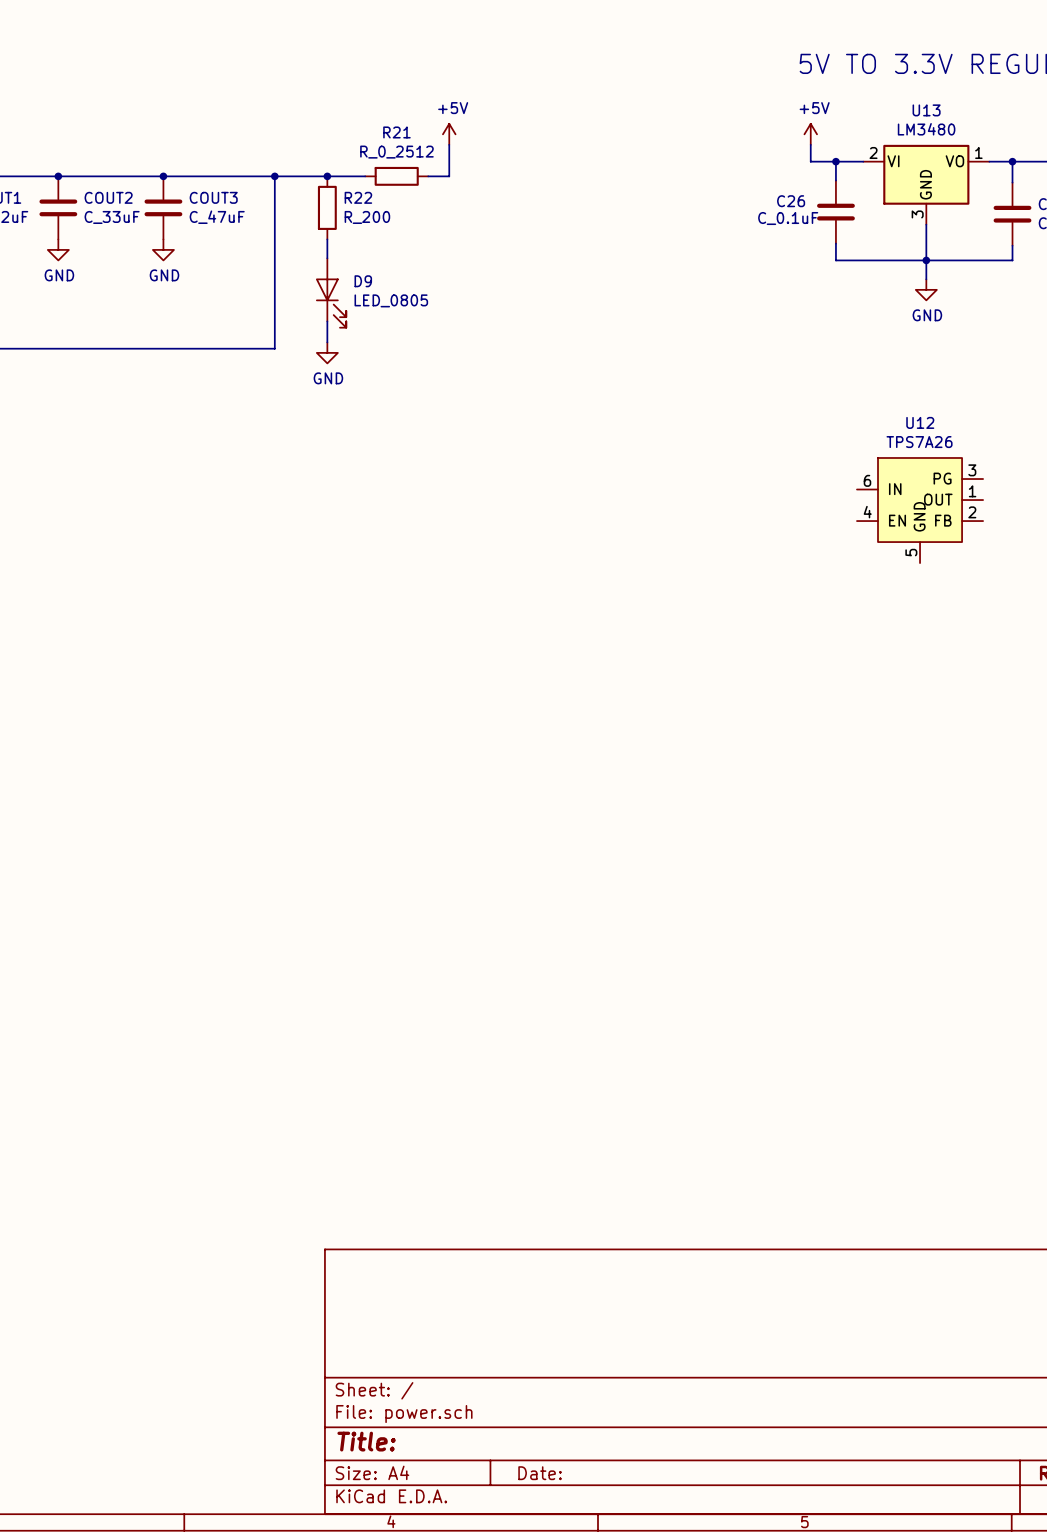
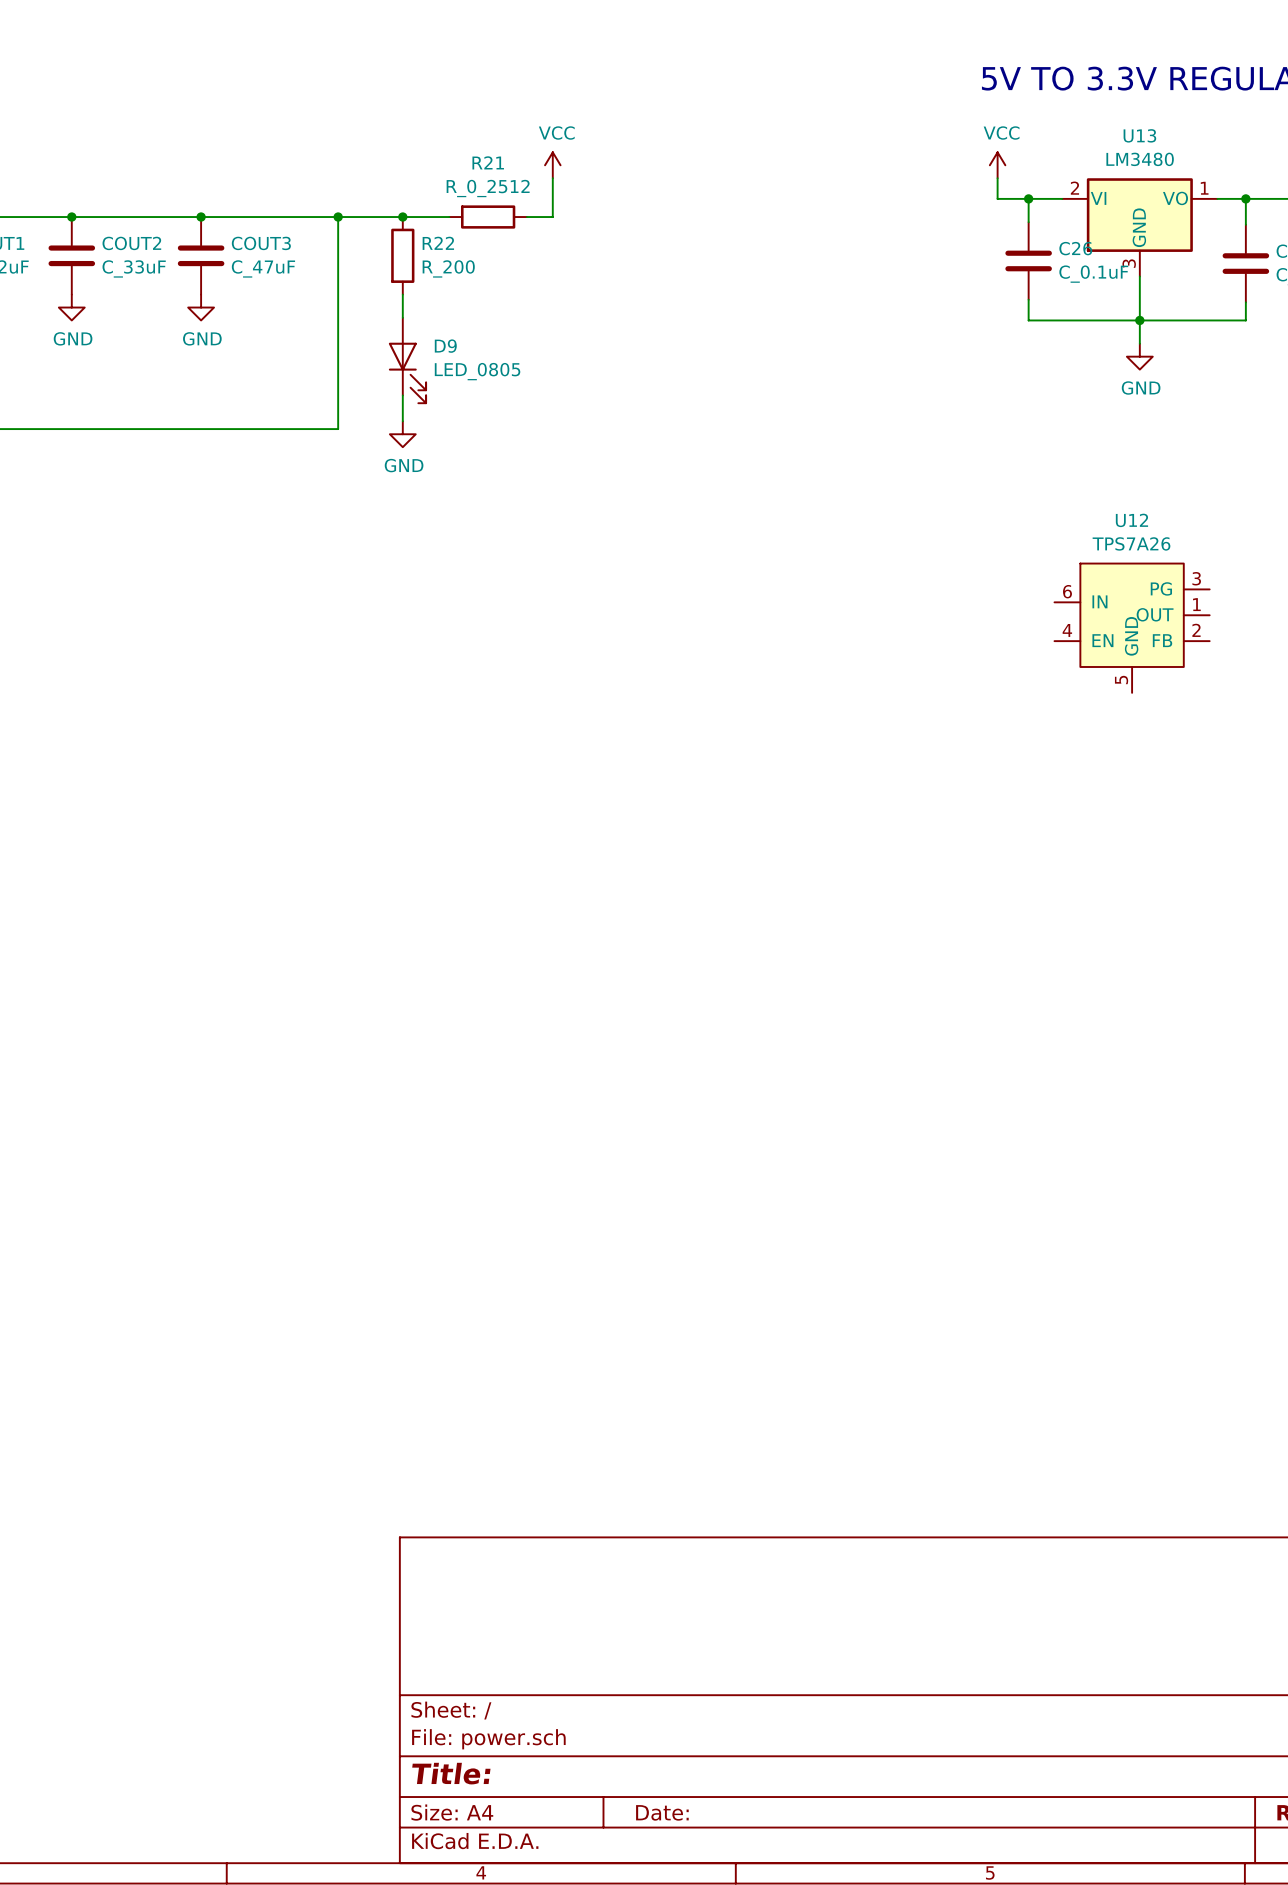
power symbol: +5V (449, 134) -> VCC (552, 165)
power symbol: +5V (810, 134) -> VCC (997, 165)
C26 name position: C26 (791, 201) -> C26 (1075, 248)
C26 value position: C_0.1uF (788, 218) -> C_0.1uF (1093, 274)

